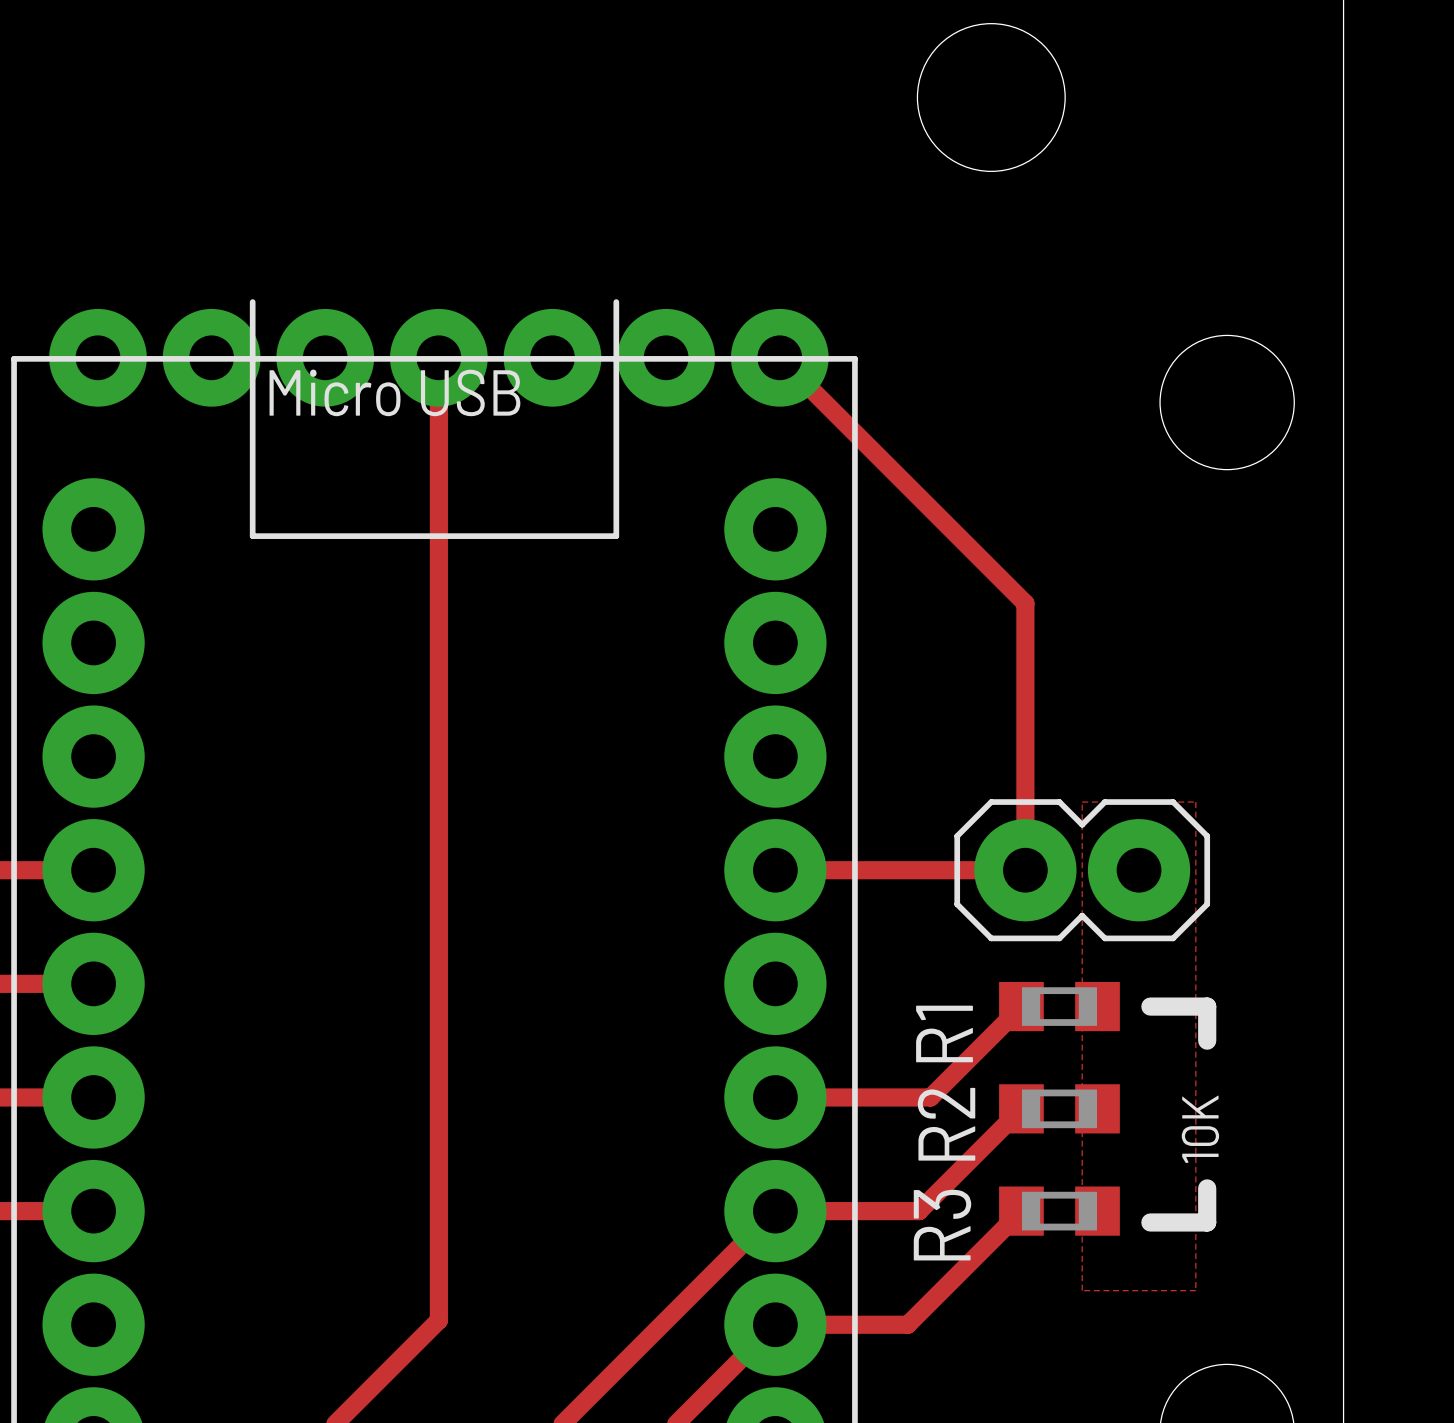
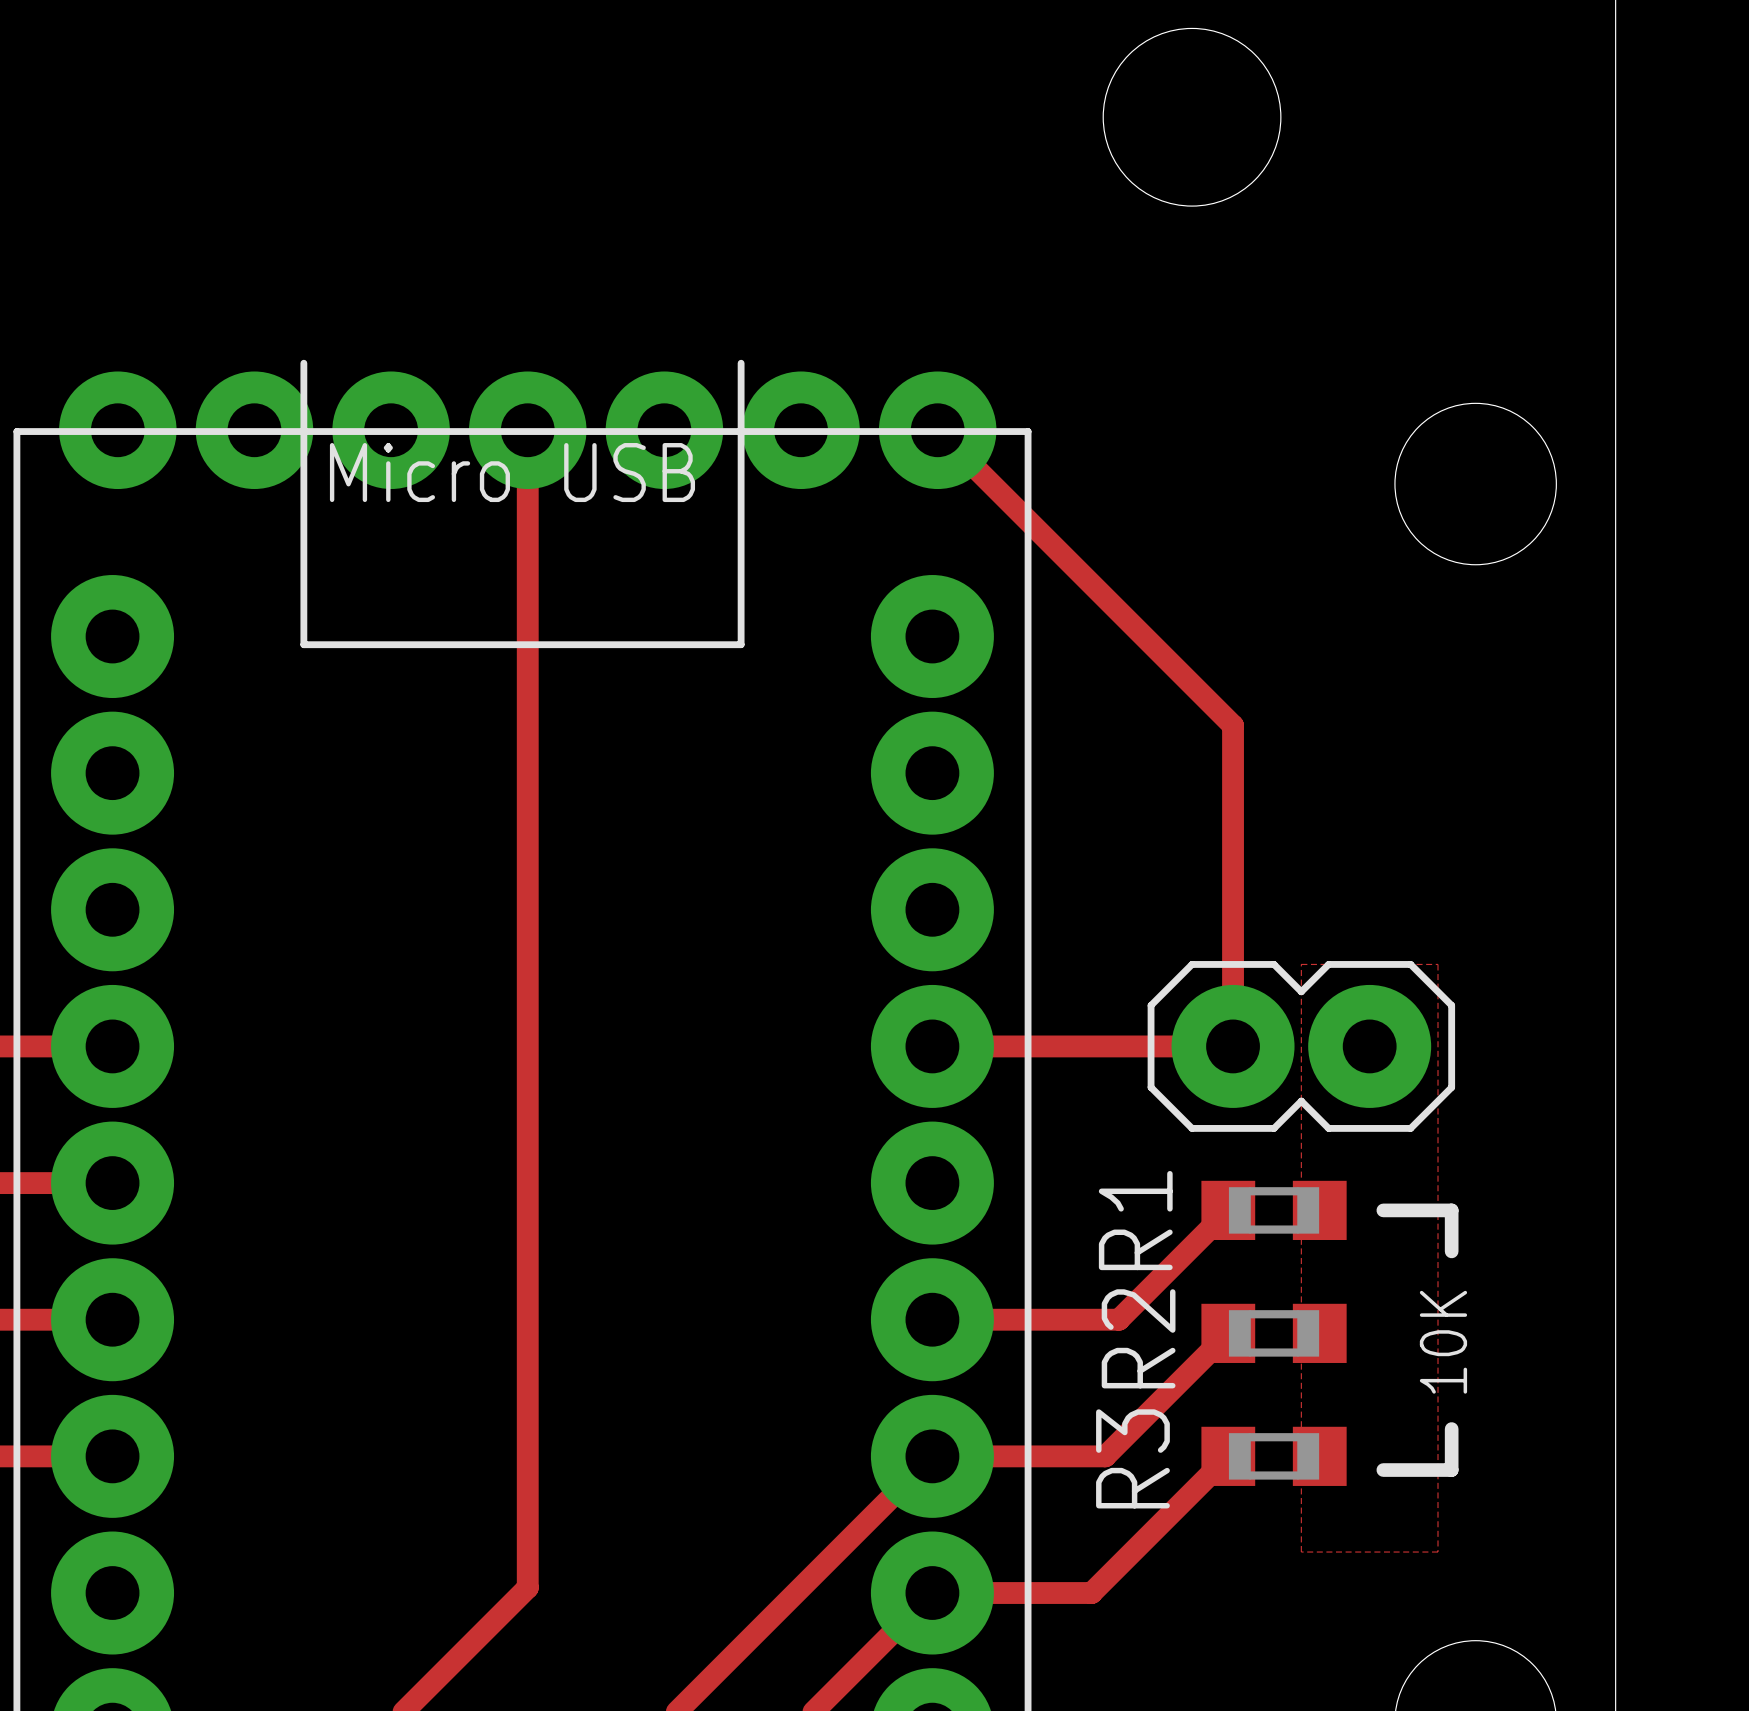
line width: thick (1150, 1006) (1207, 1006) (1207, 1040) -> thin (1383, 1210) (1451, 1210) (1451, 1251)
line width: thick (1207, 1188) (1207, 1222) (1150, 1222) -> thin (1451, 1429) (1451, 1470) (1383, 1470)

